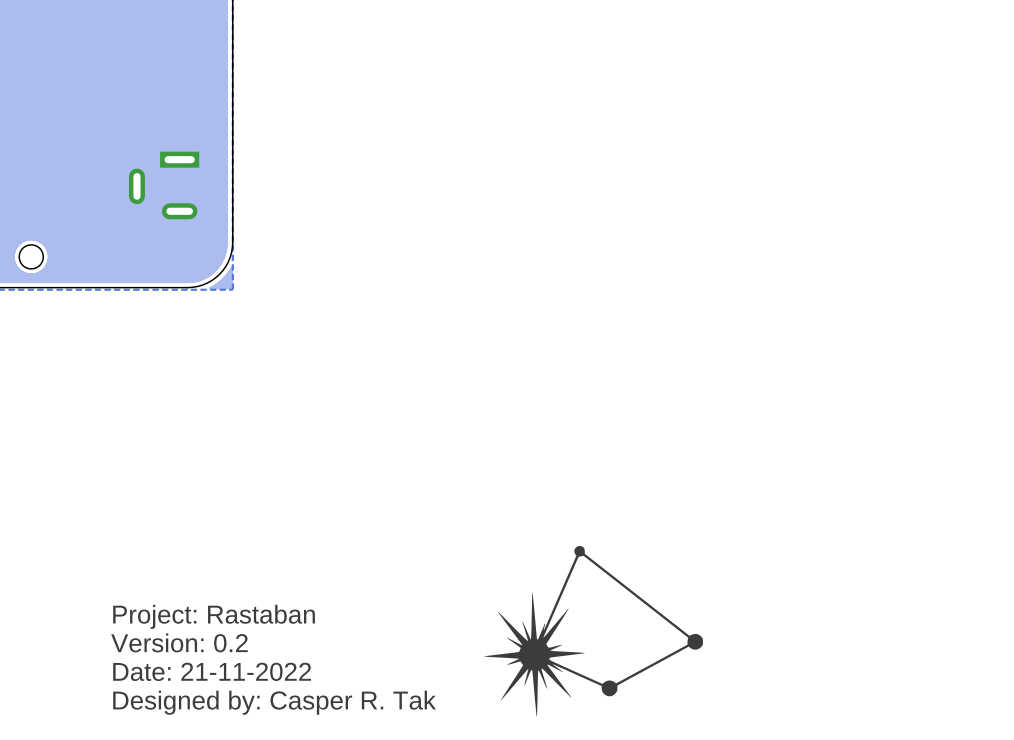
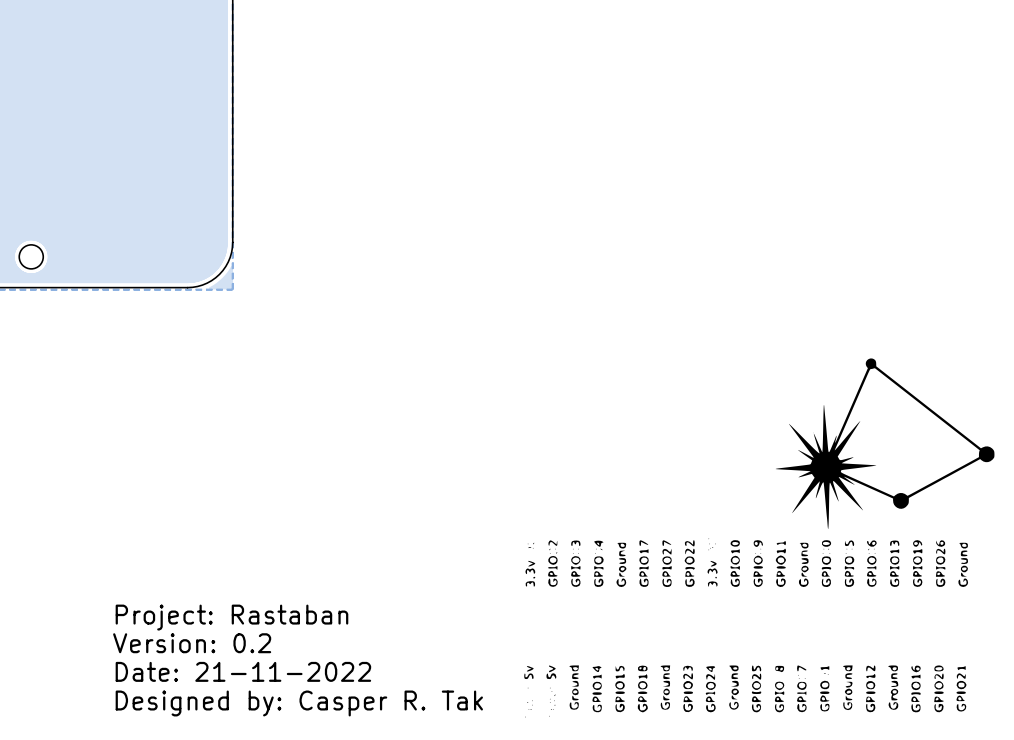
part: (164, 185) -> none
drawing: none -> [524, 358, 995, 718]
drawing: [484, 545, 704, 717] -> none

